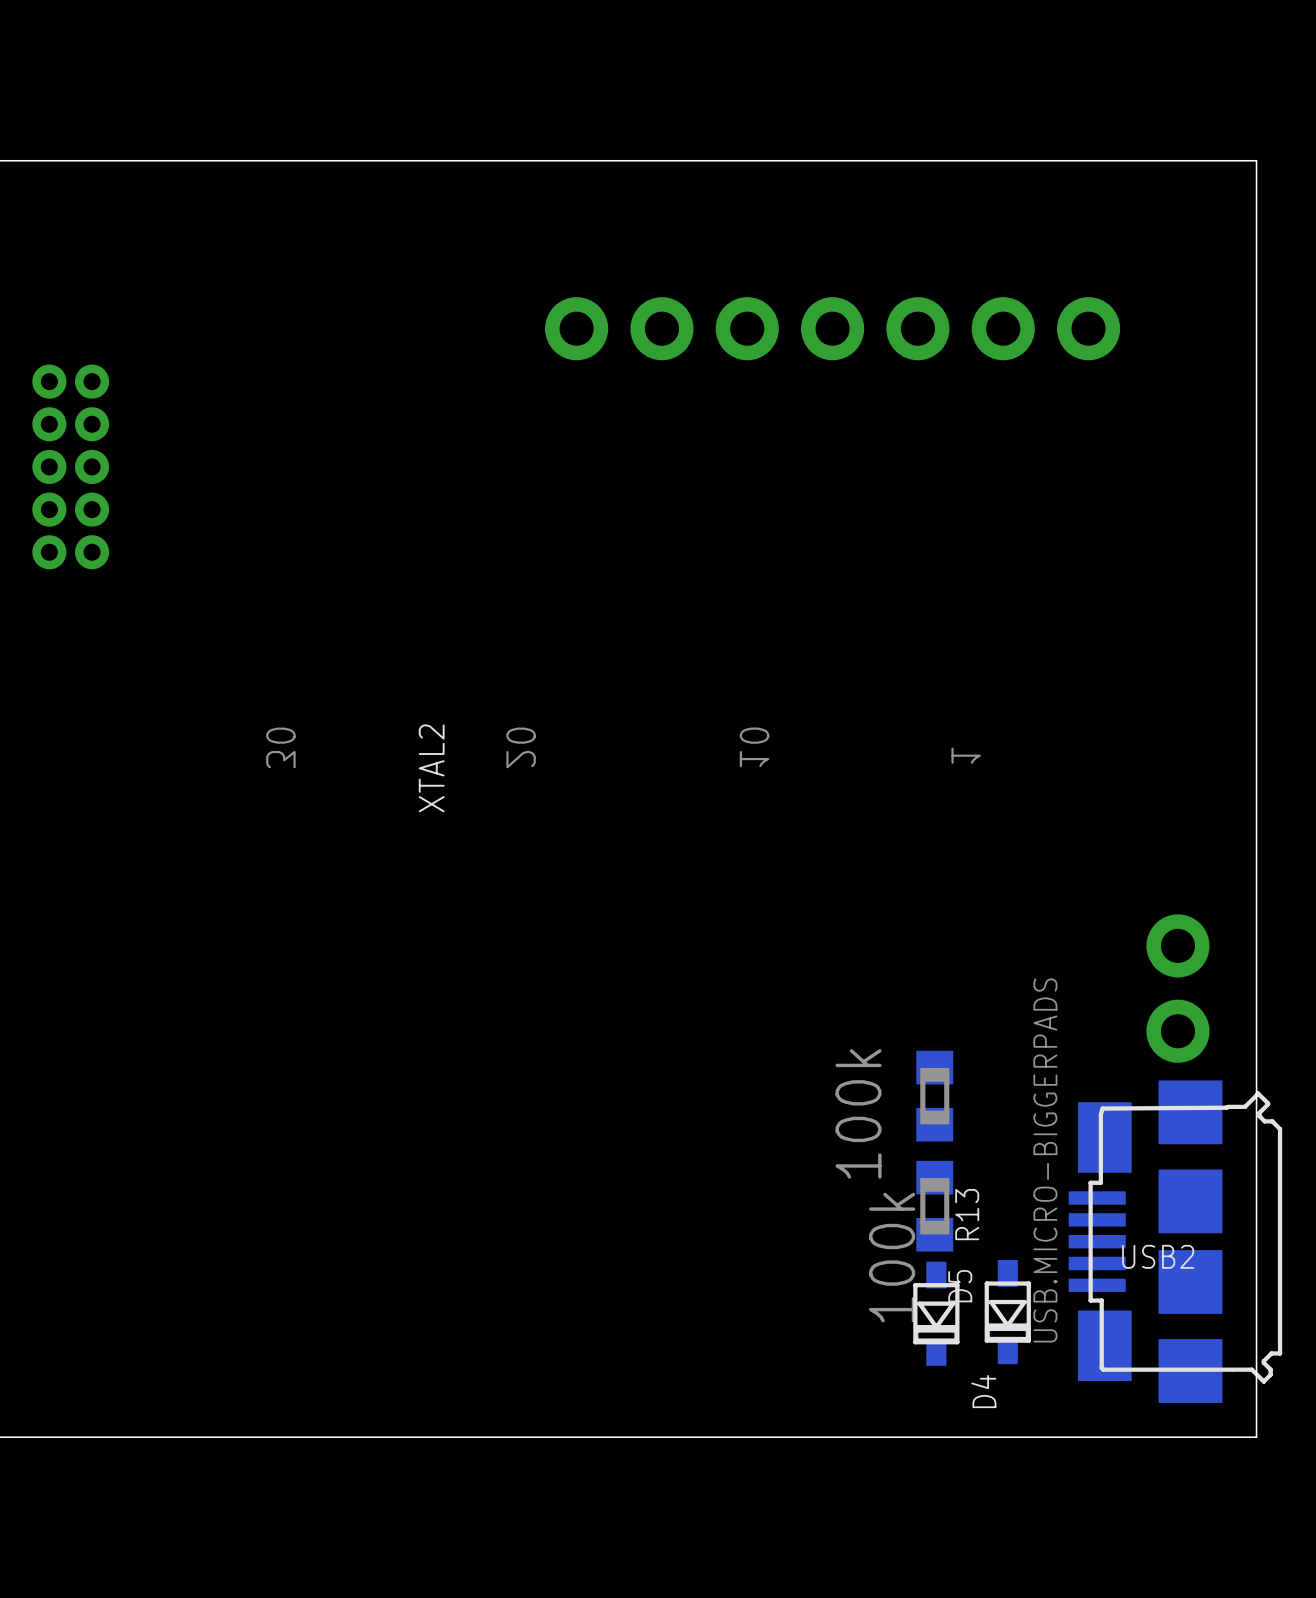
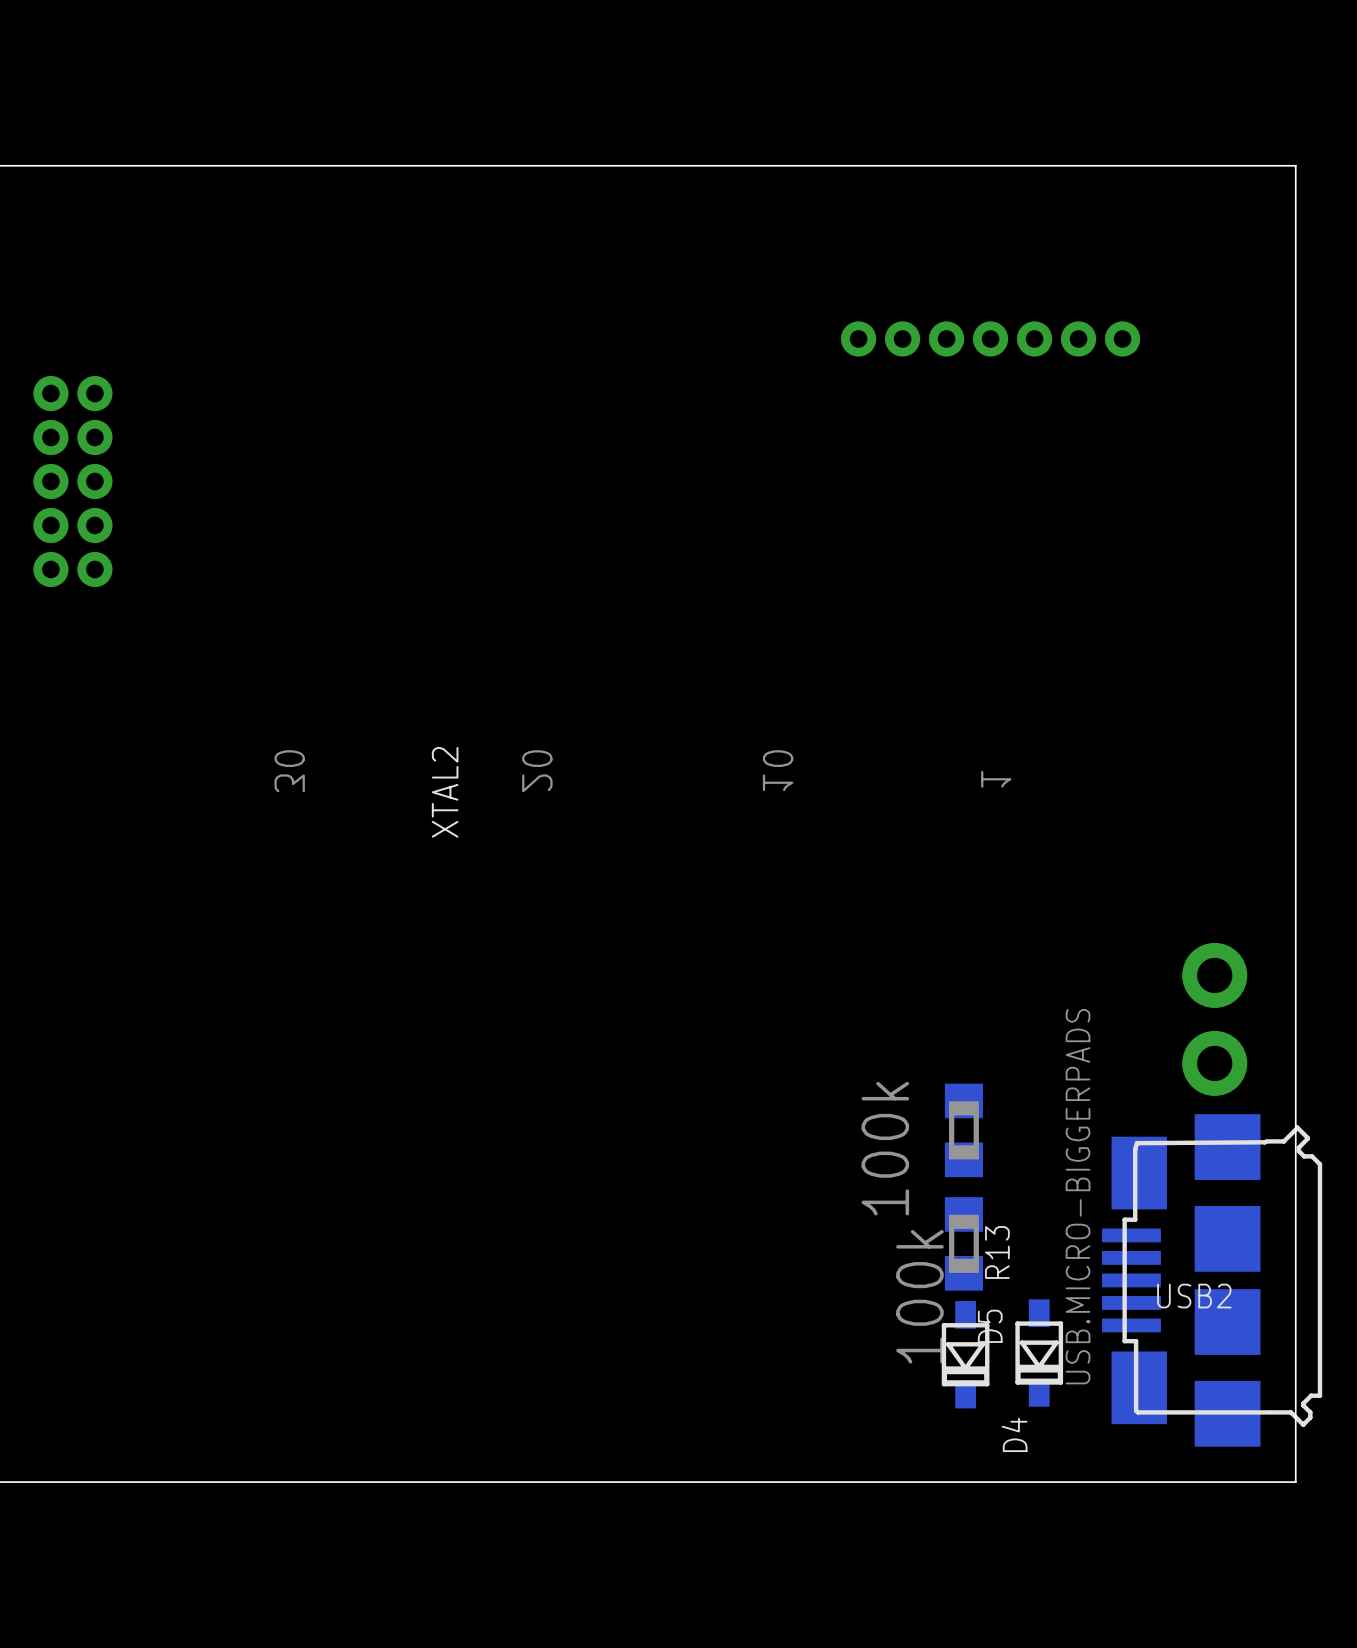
part: (832, 328) -> none
part: none -> (990, 338)

